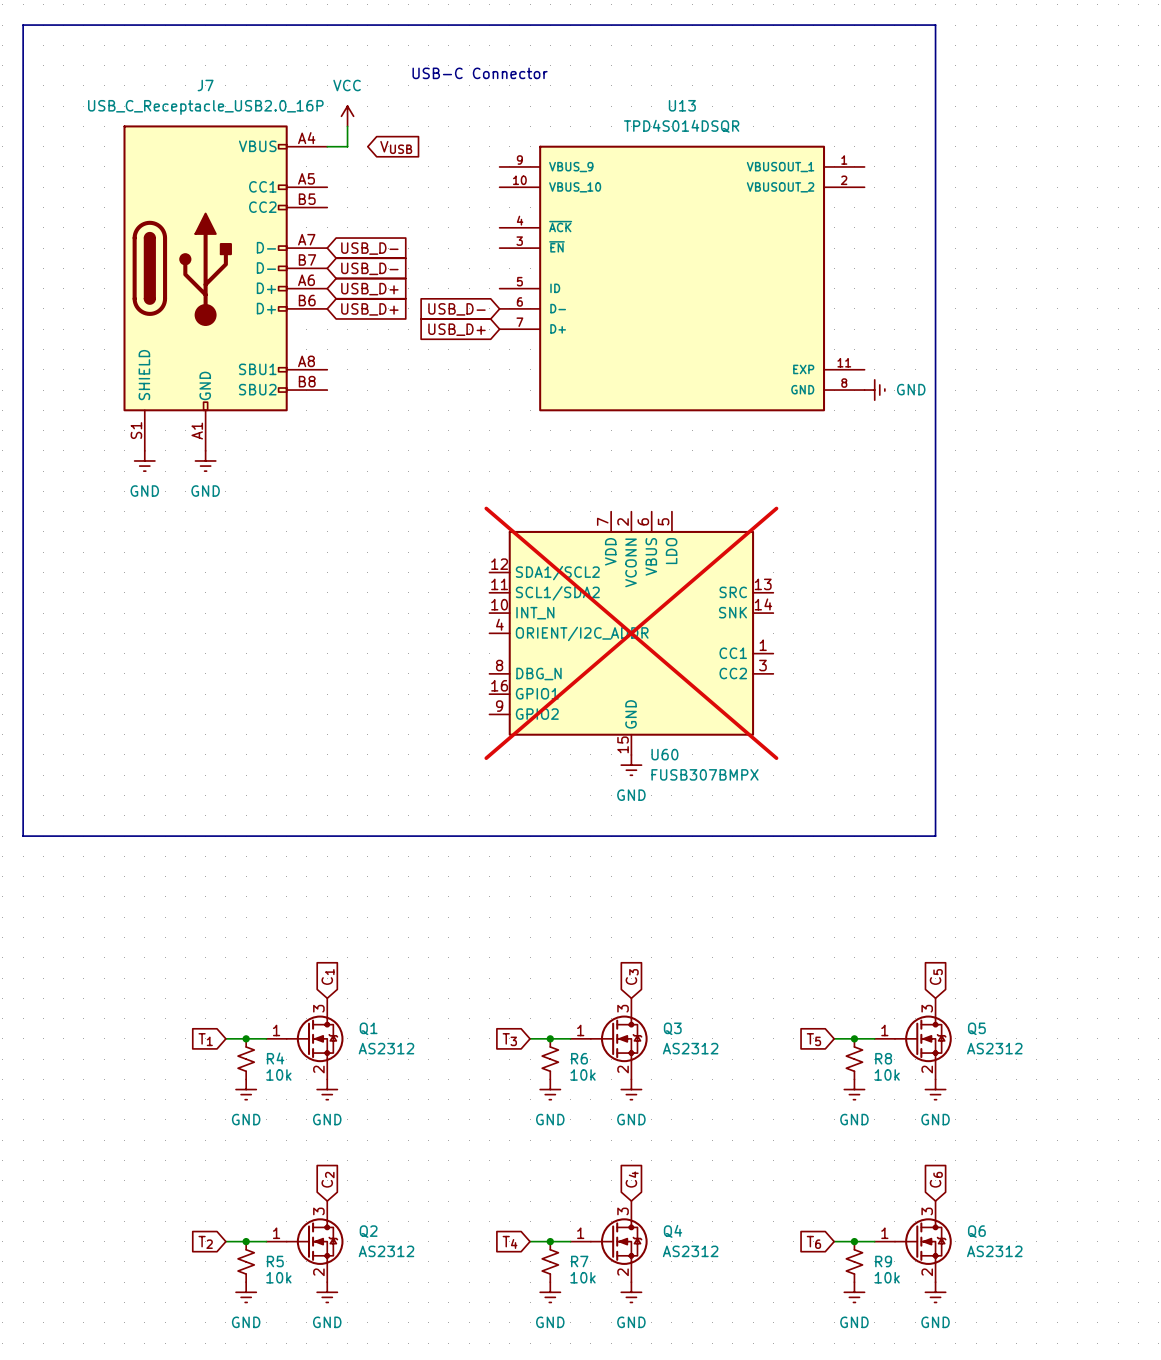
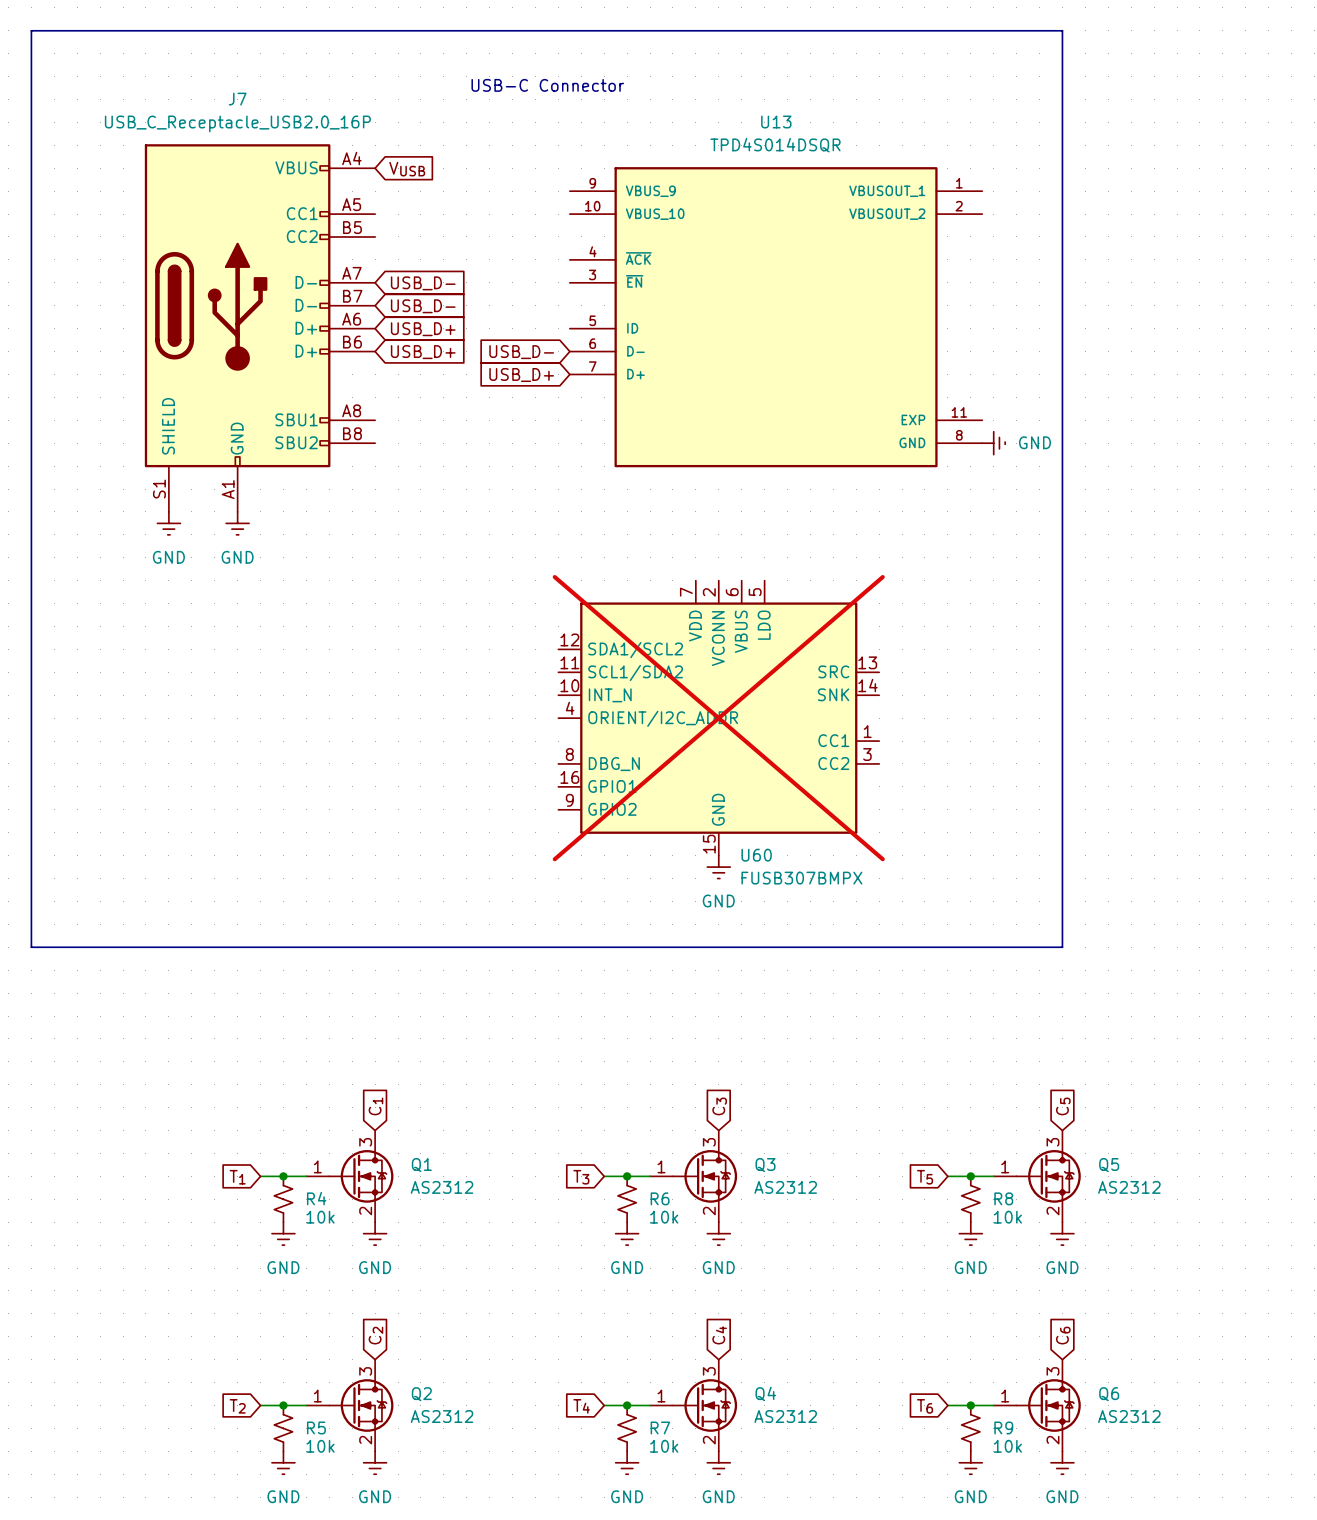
power symbol: VCC (347, 116) -> none
wire: (347, 126) (347, 146) (327, 146) -> none
global label position: VUSB (396, 147) -> VUSB (407, 169)

